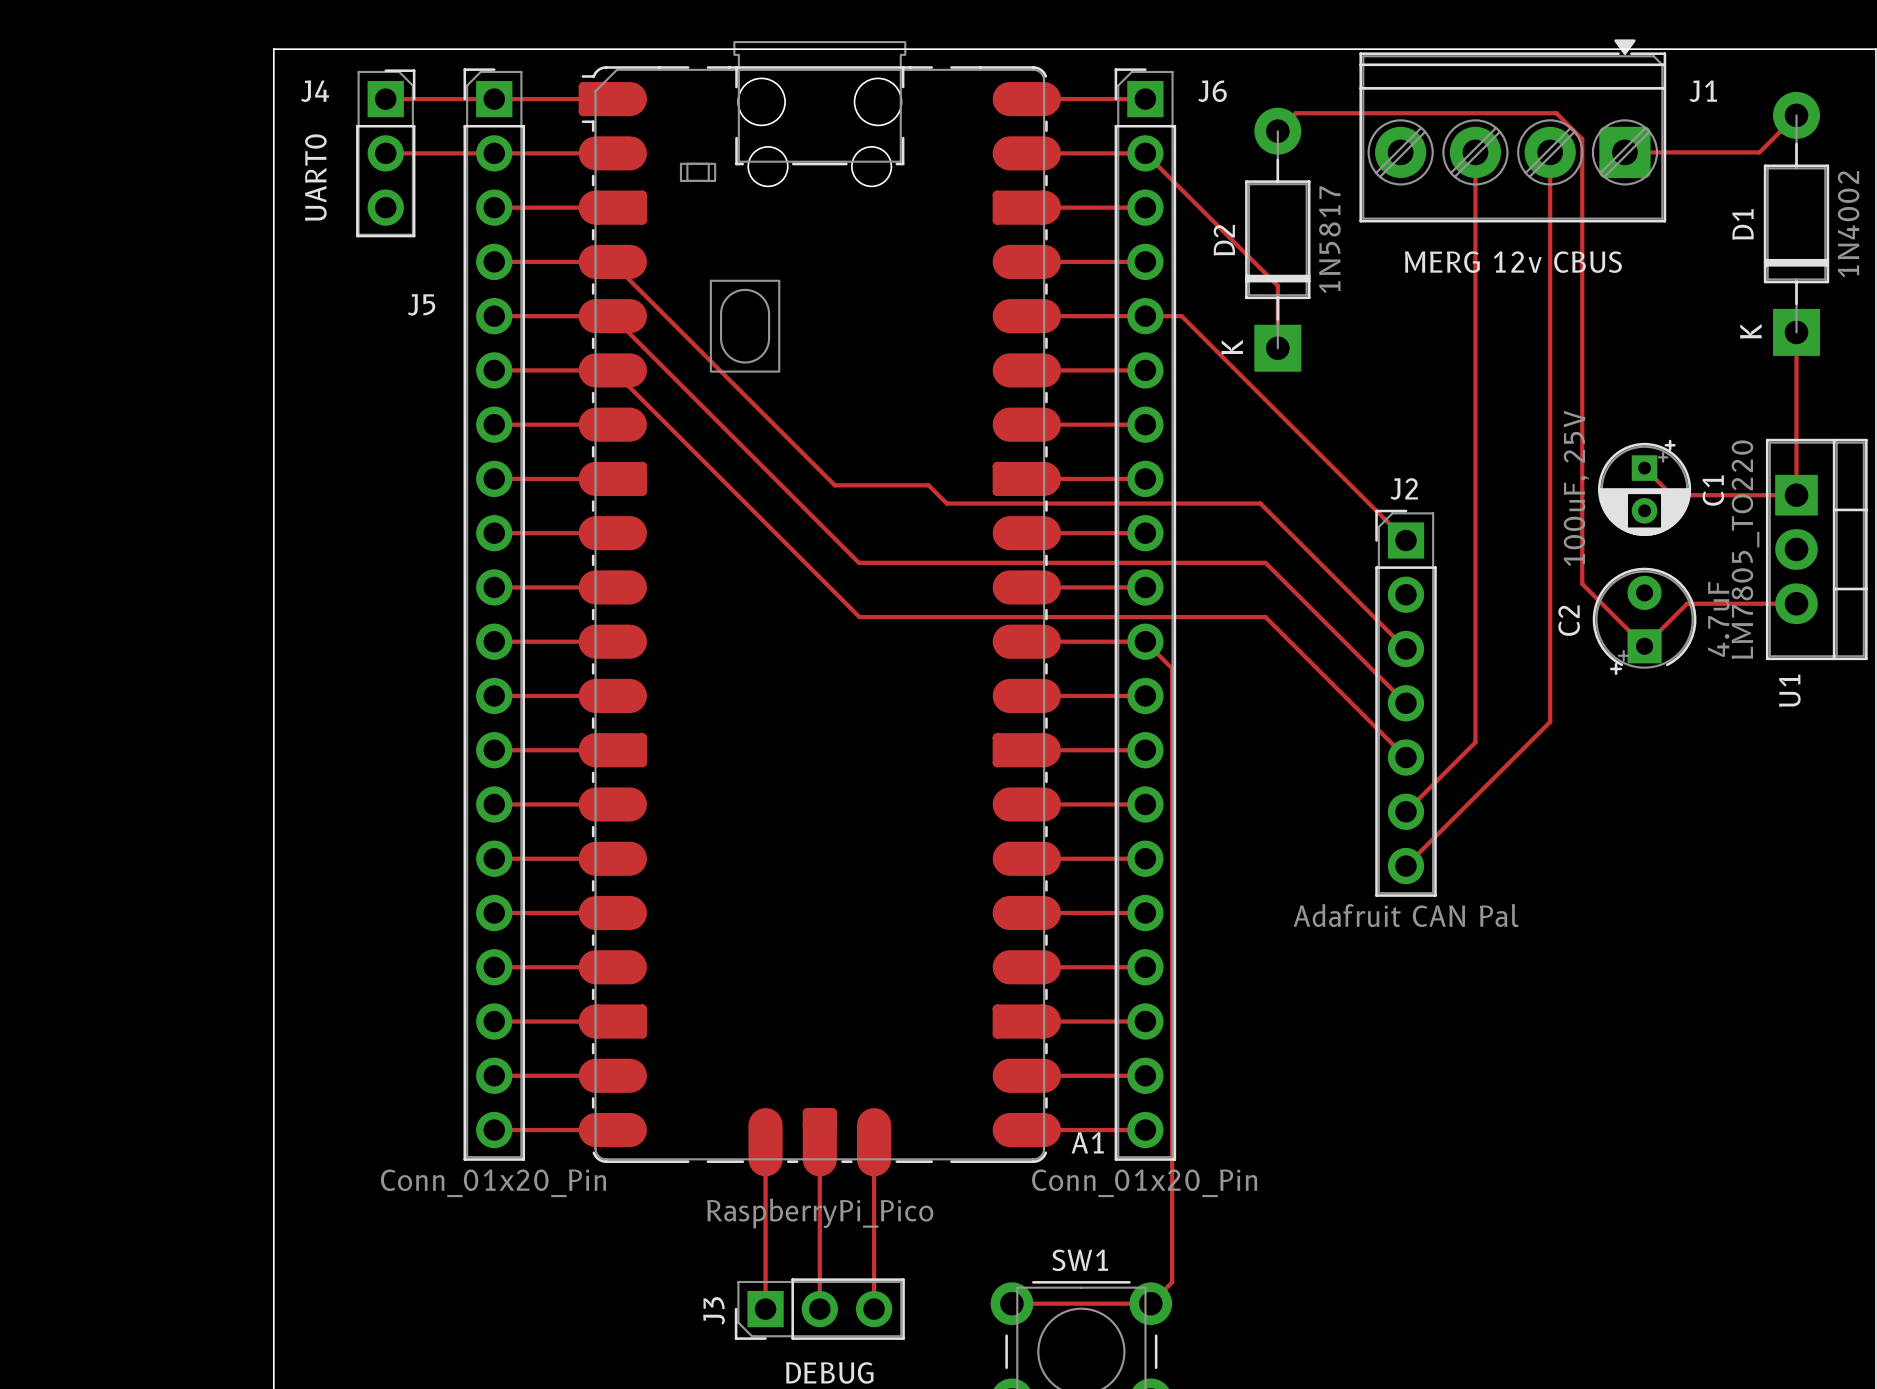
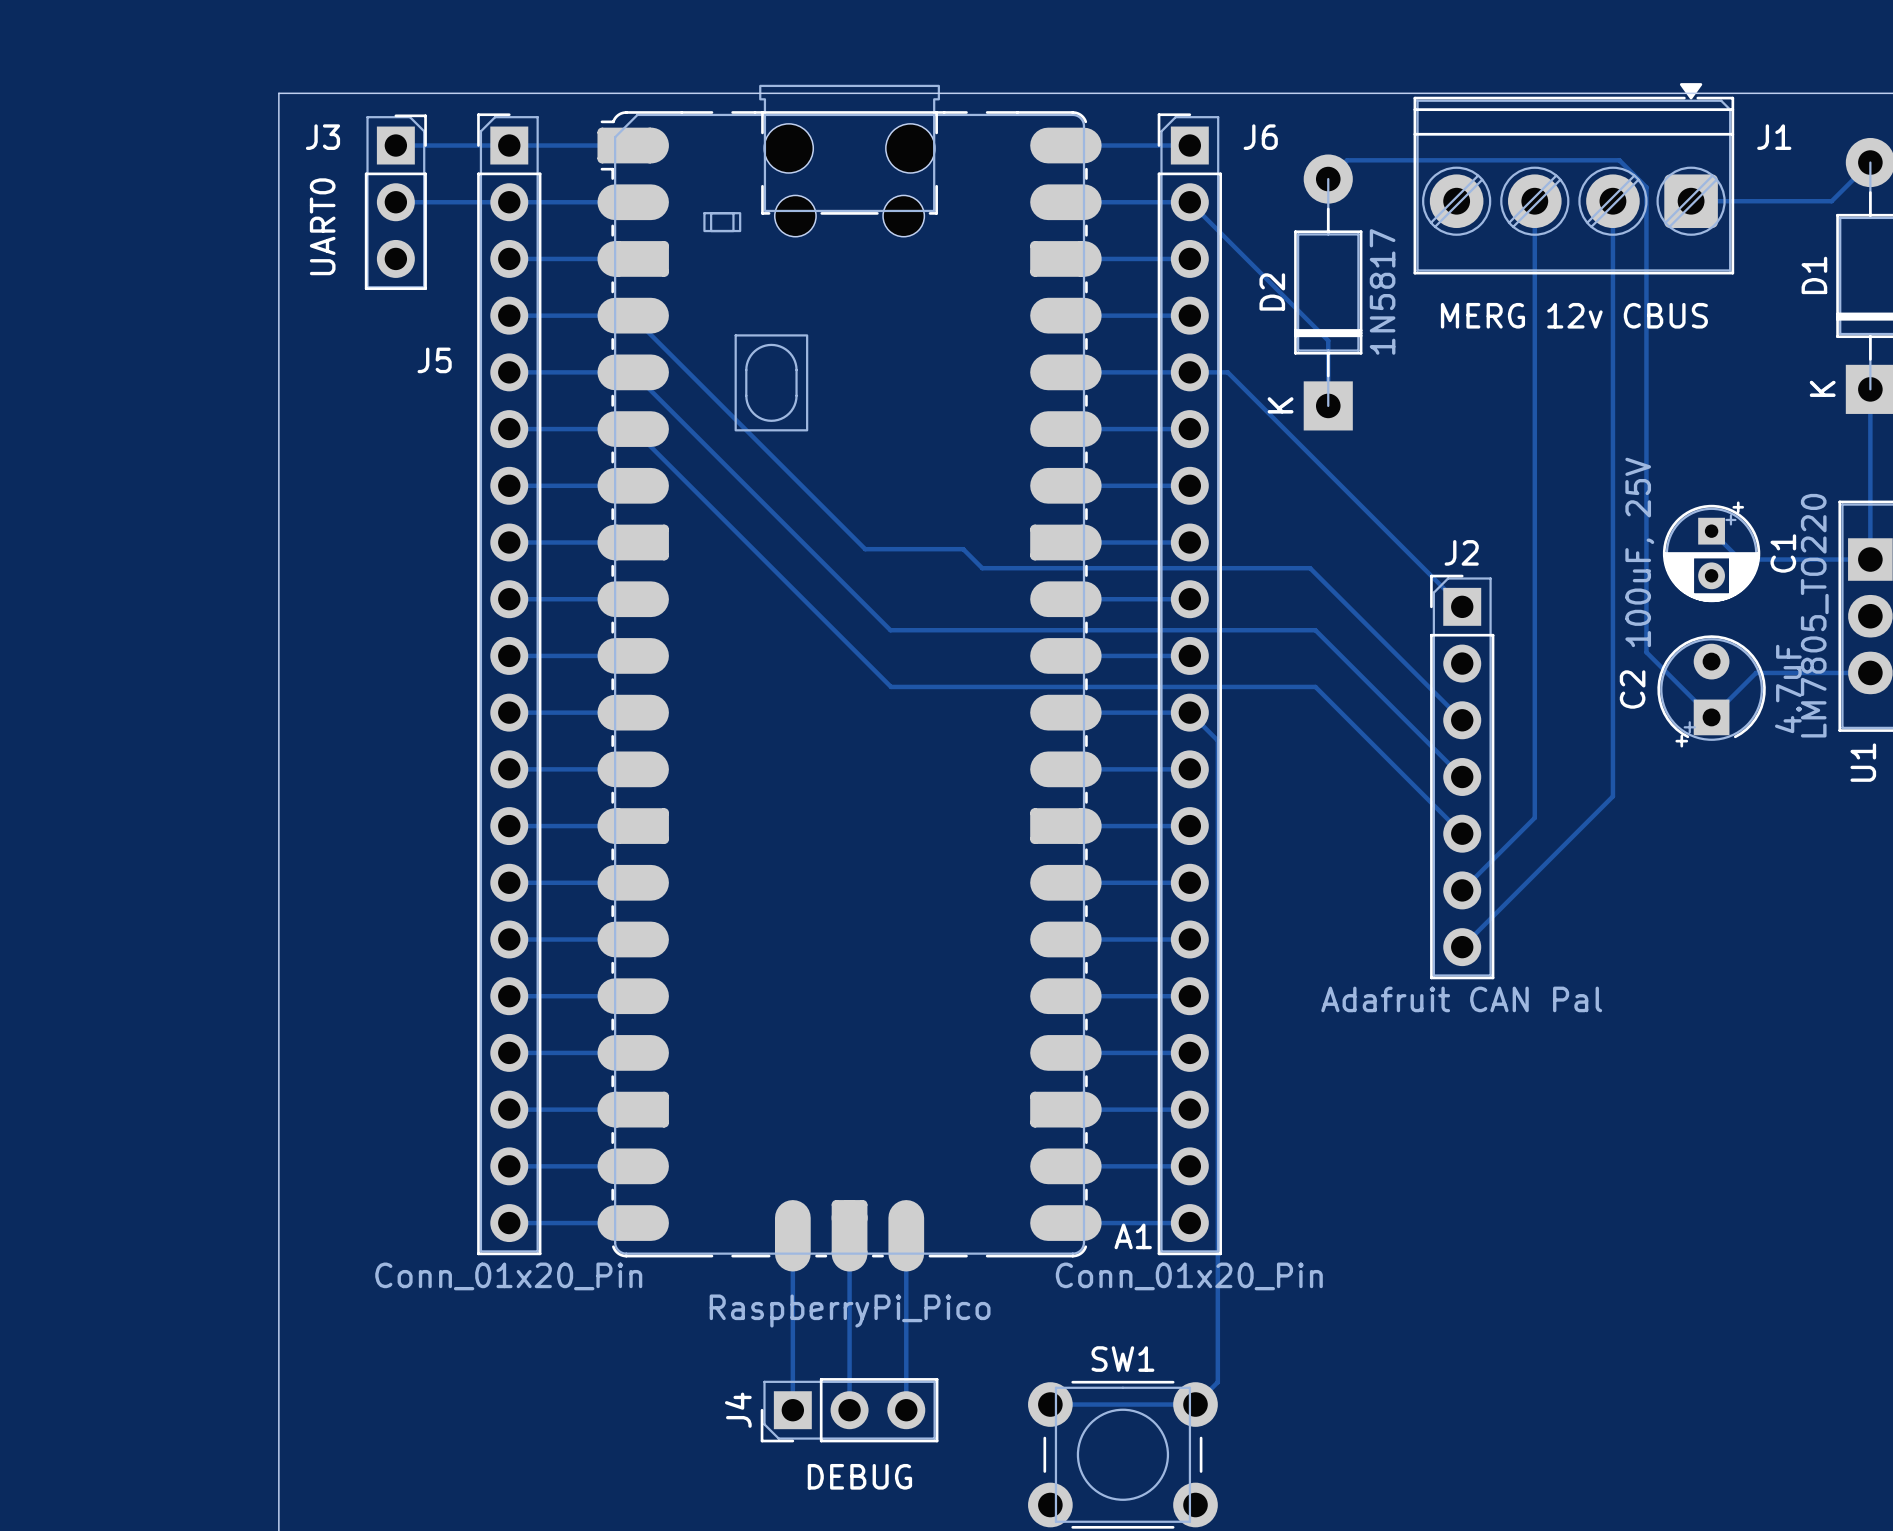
J4 name: J4 (315, 91) -> J3 (322, 137)
J3 name: J3 (714, 1310) -> J4 (738, 1410)

